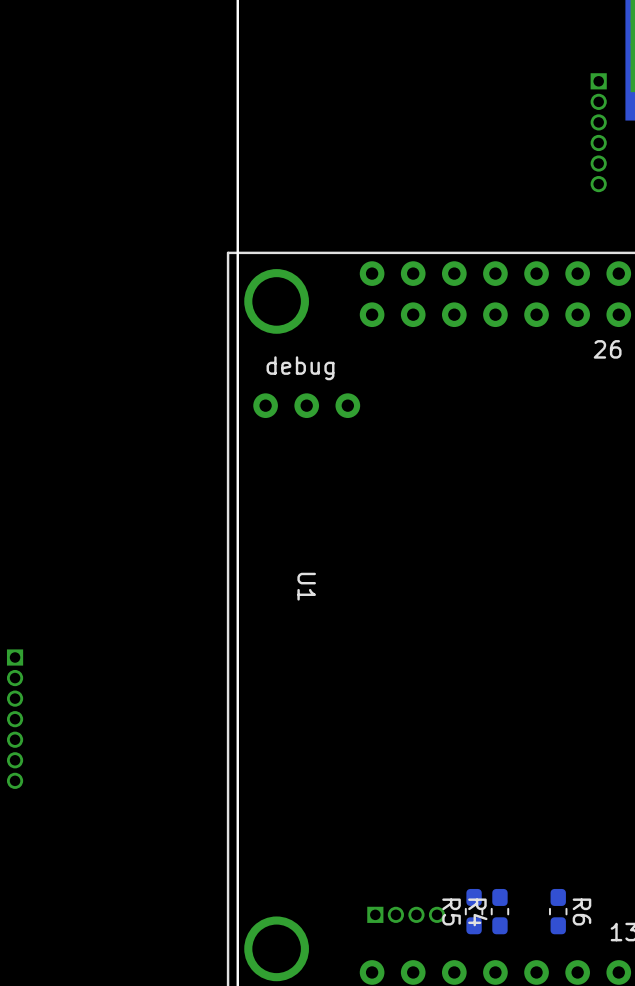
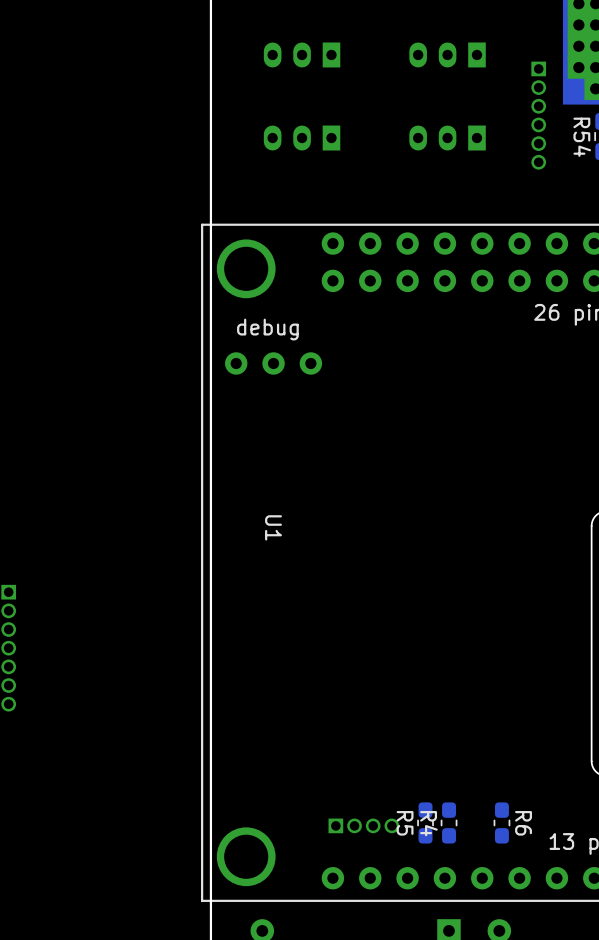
part: none -> (302, 54)
part: none -> (447, 54)
part: none -> (302, 138)
part: none -> (447, 138)

